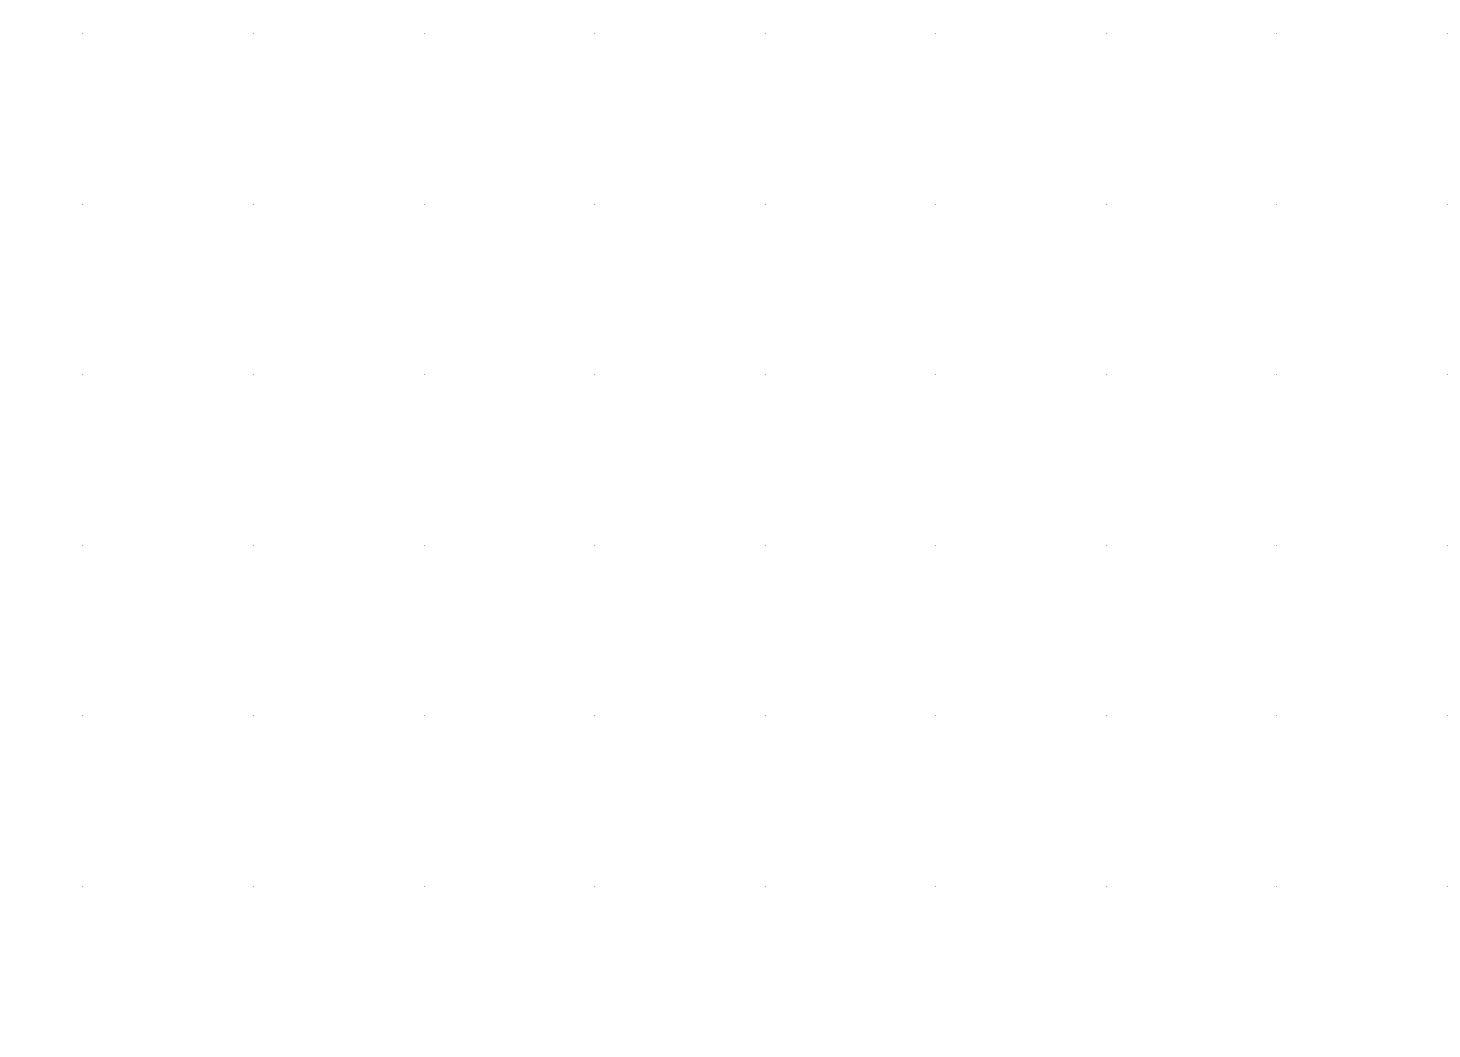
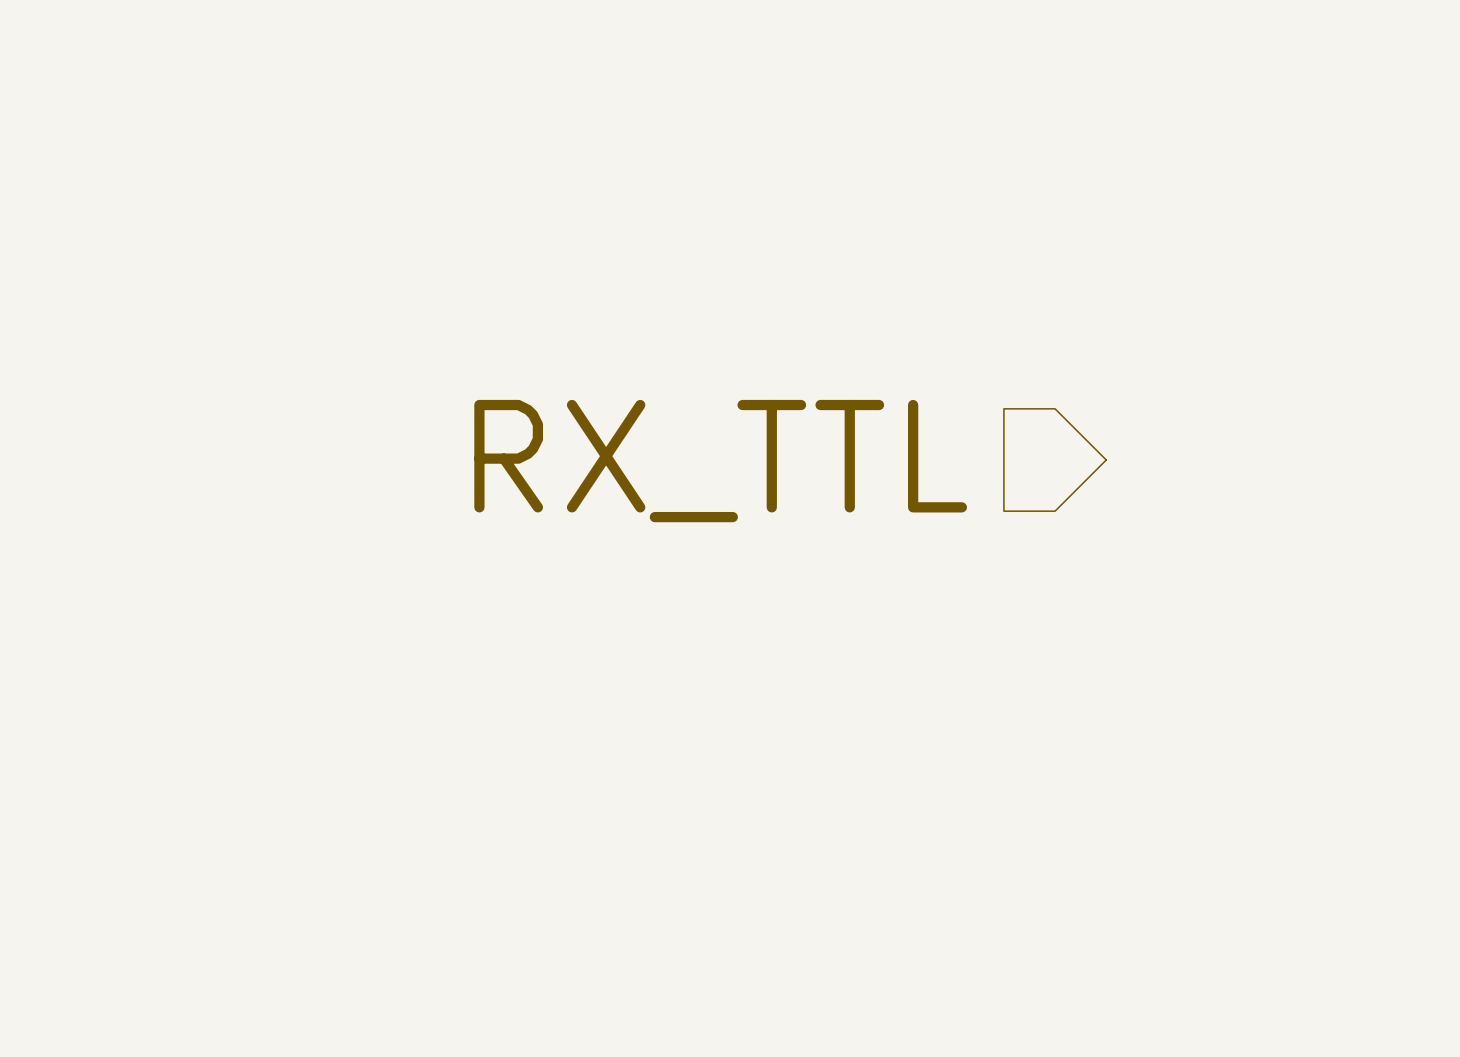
hierarchical label: none -> RX_TTL (720, 461)

